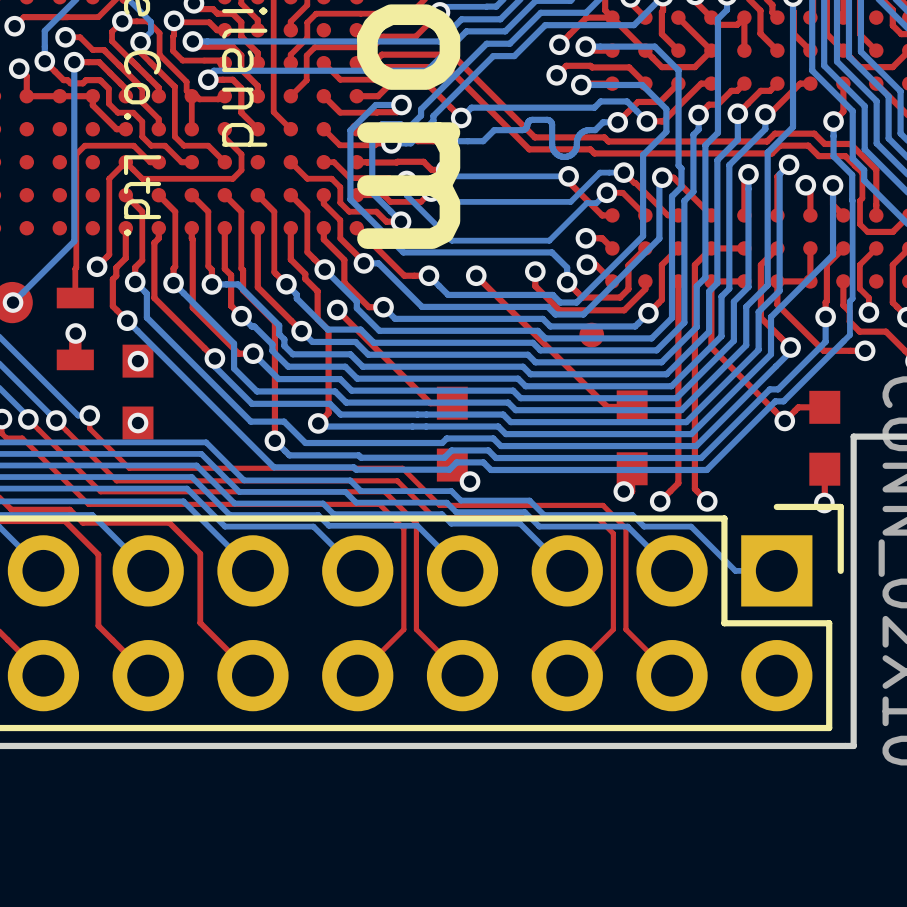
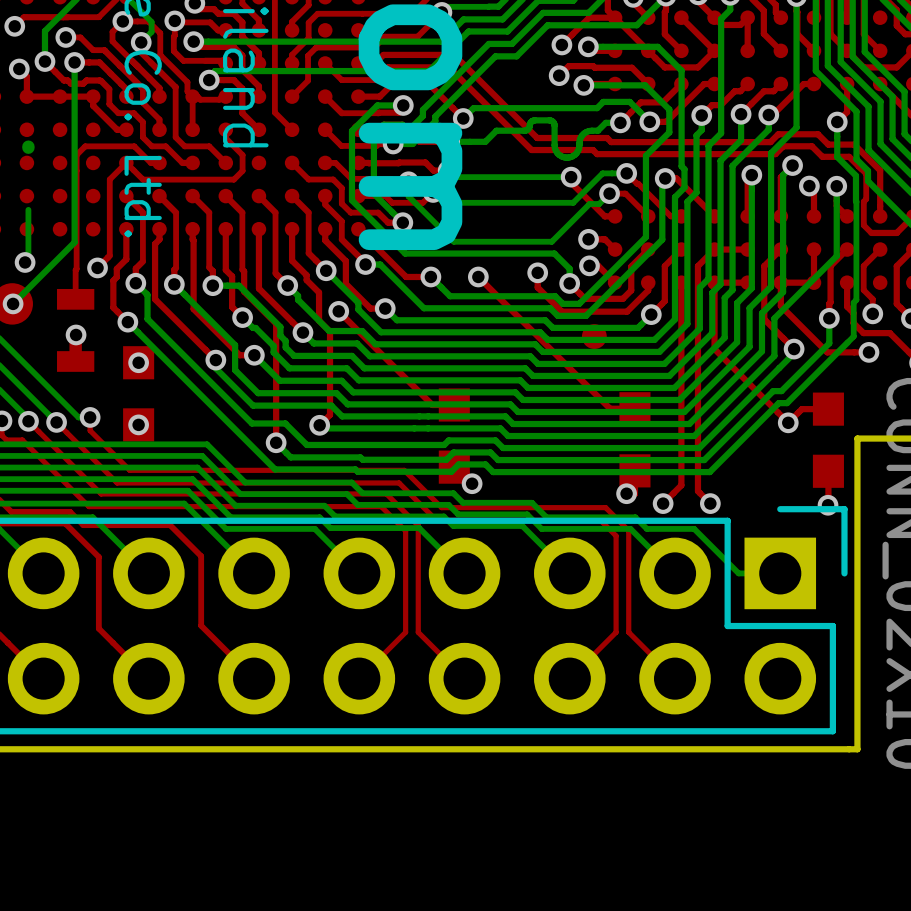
bottom track: none -> (28, 146) (28, 147)
bottom track: none -> (28, 209) (28, 259) (25, 262)
via: none -> (25, 262)

